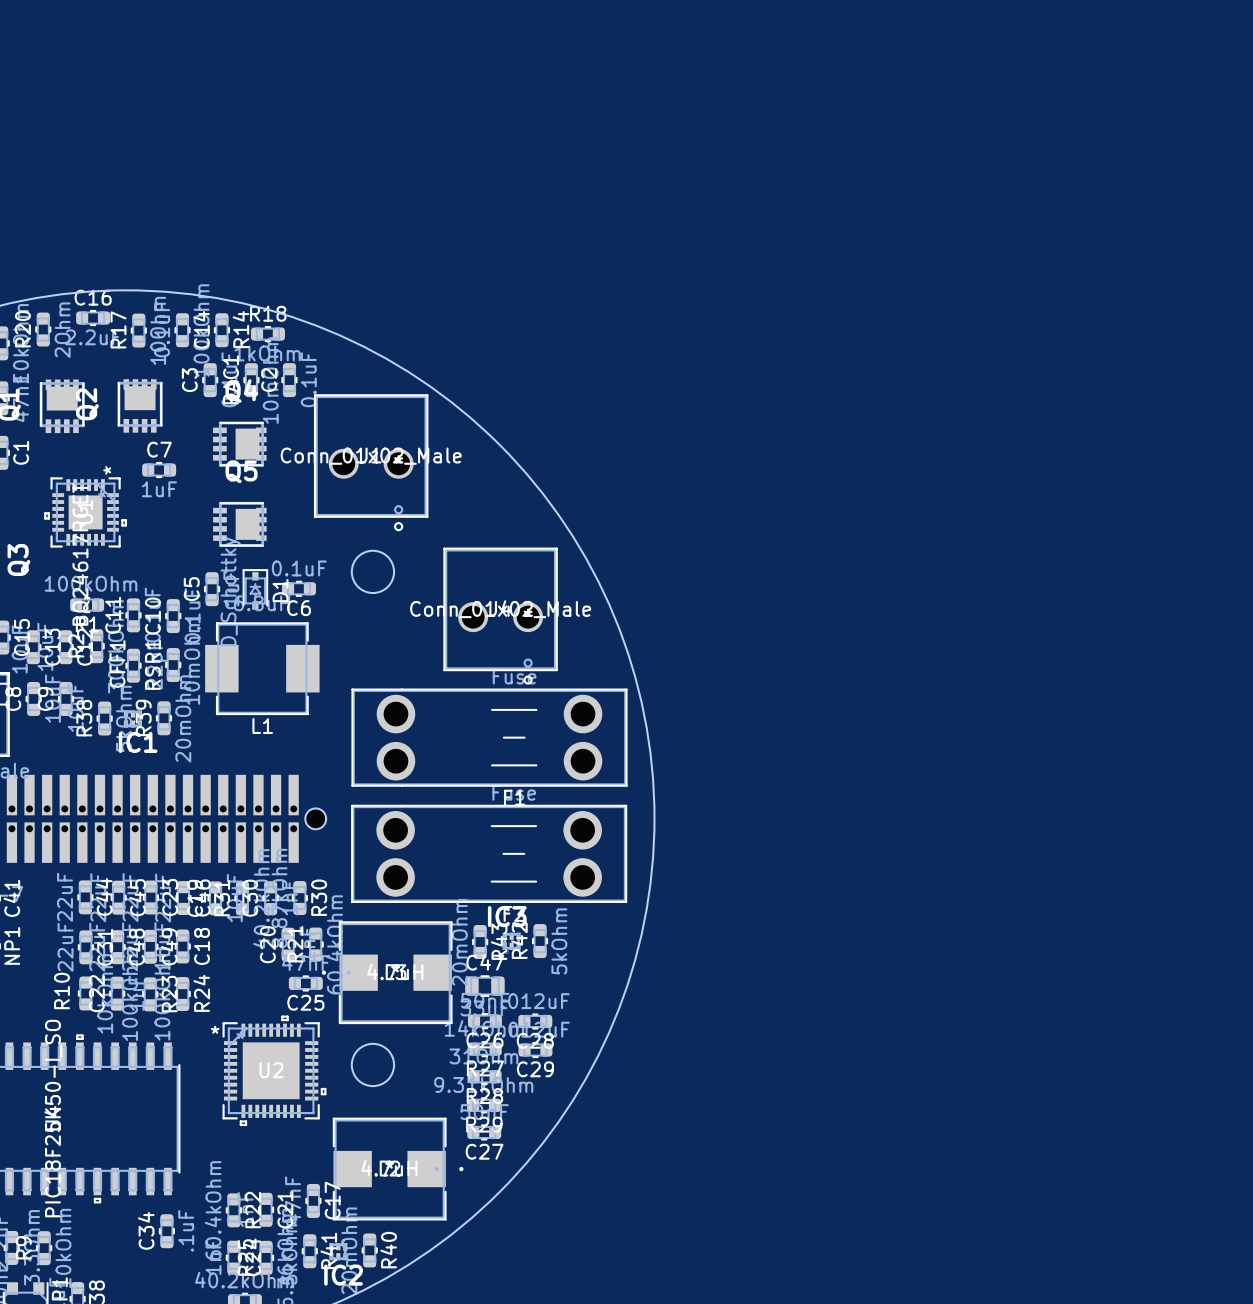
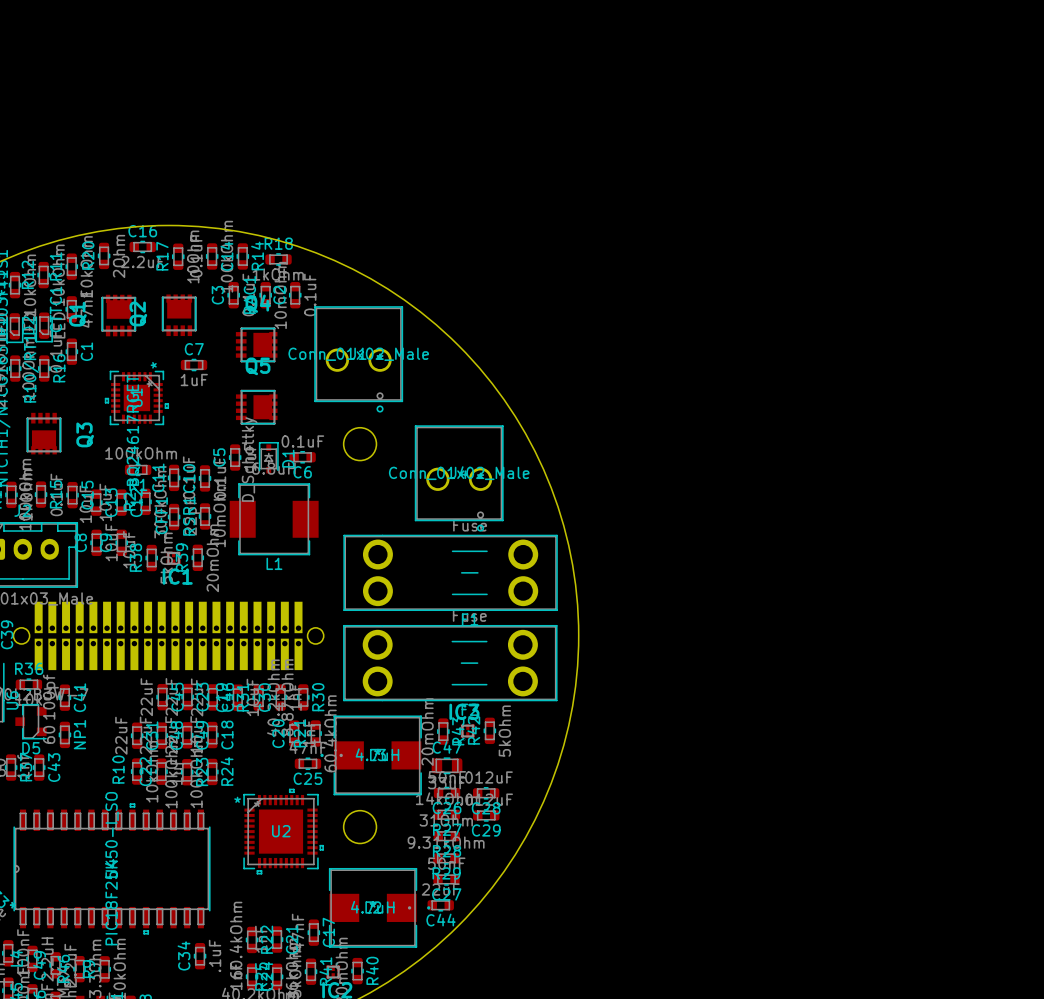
C44 rotation: 0° (85, 897) -> 90° clockwise (440, 905)
C44 position: (85, 897) -> (440, 905)

